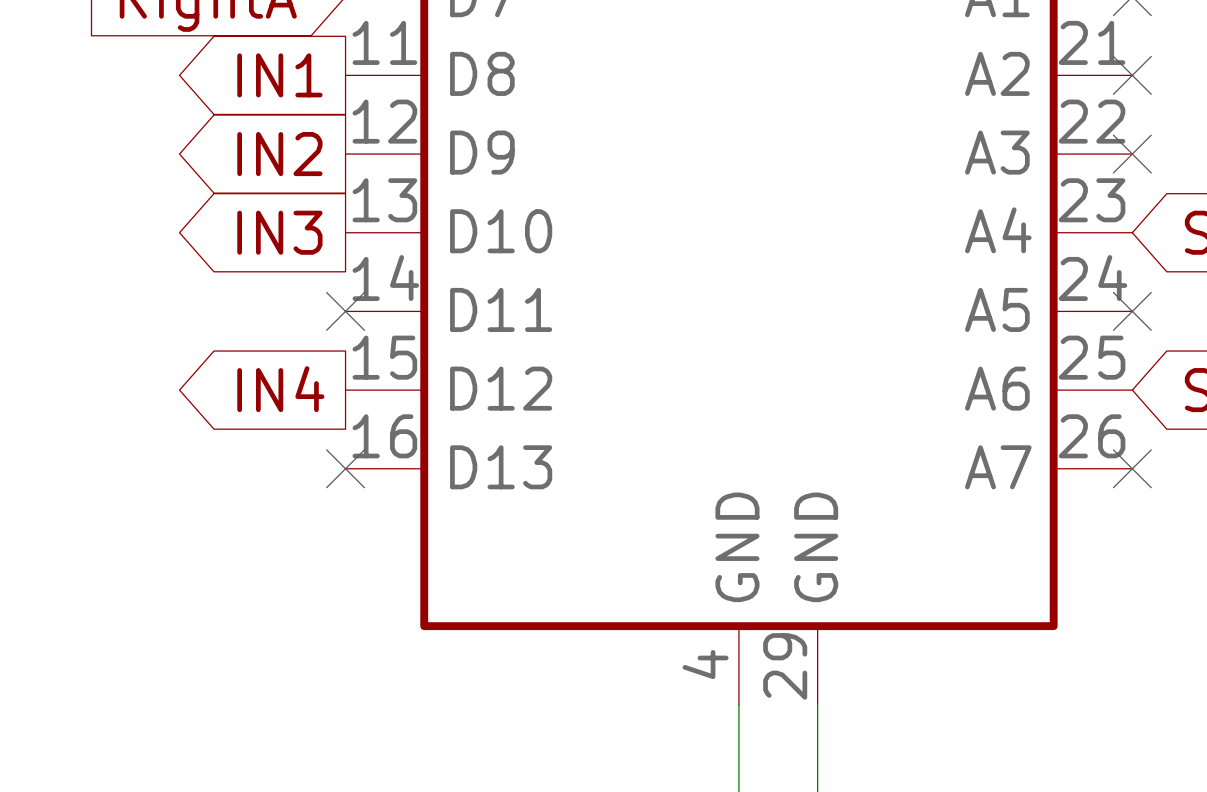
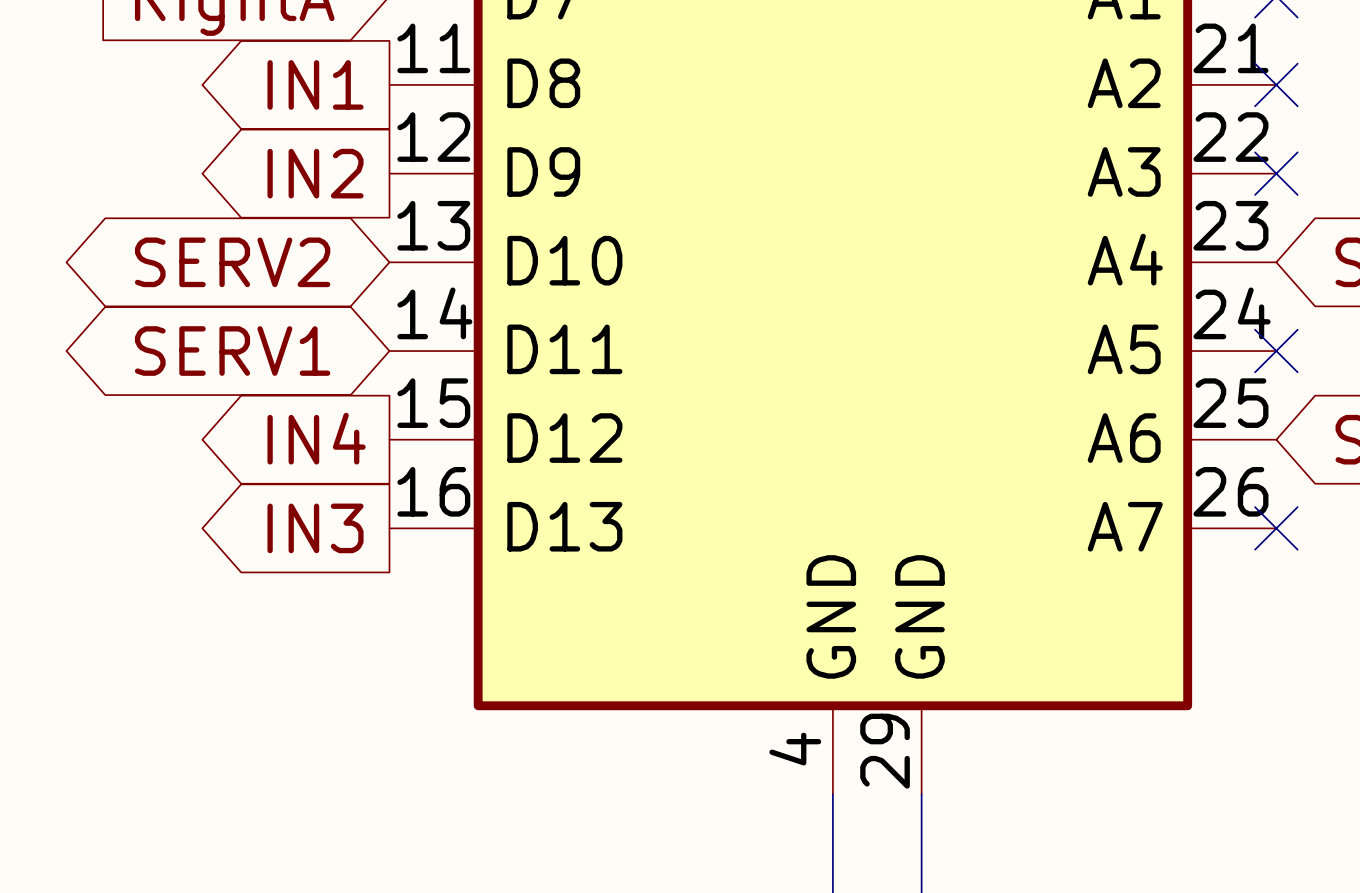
global label shape: output (279, 232) -> bidirectional (232, 262)
global label: IN3 (279, 232) -> SERV2 (232, 262)
global label: none -> SERV1 (232, 351)
no-connect mark: (345, 311) -> none
global label: none -> IN3 (315, 528)
no-connect mark: (345, 468) -> none

